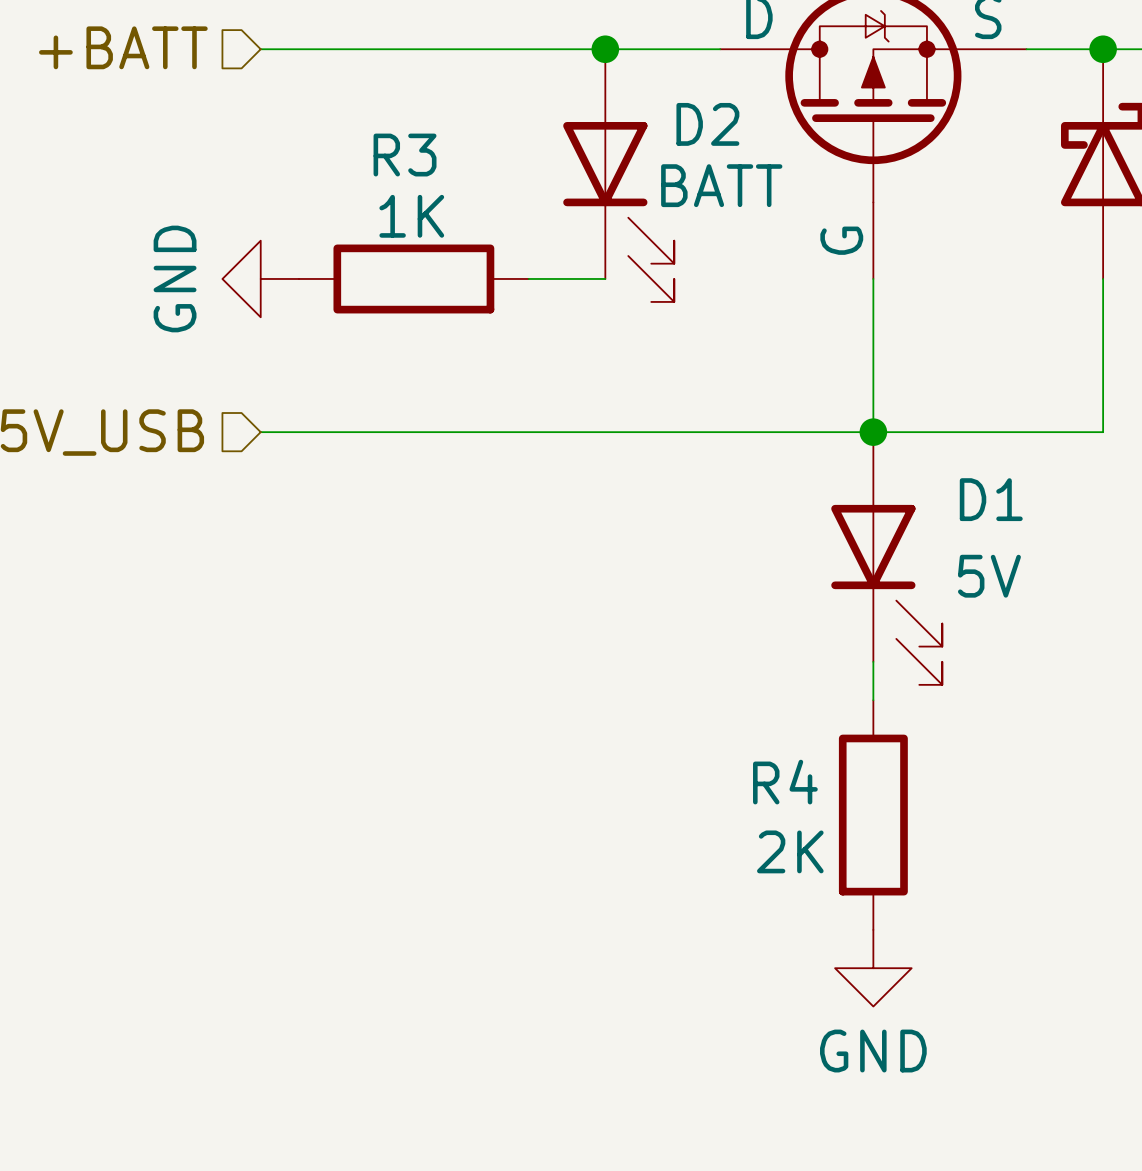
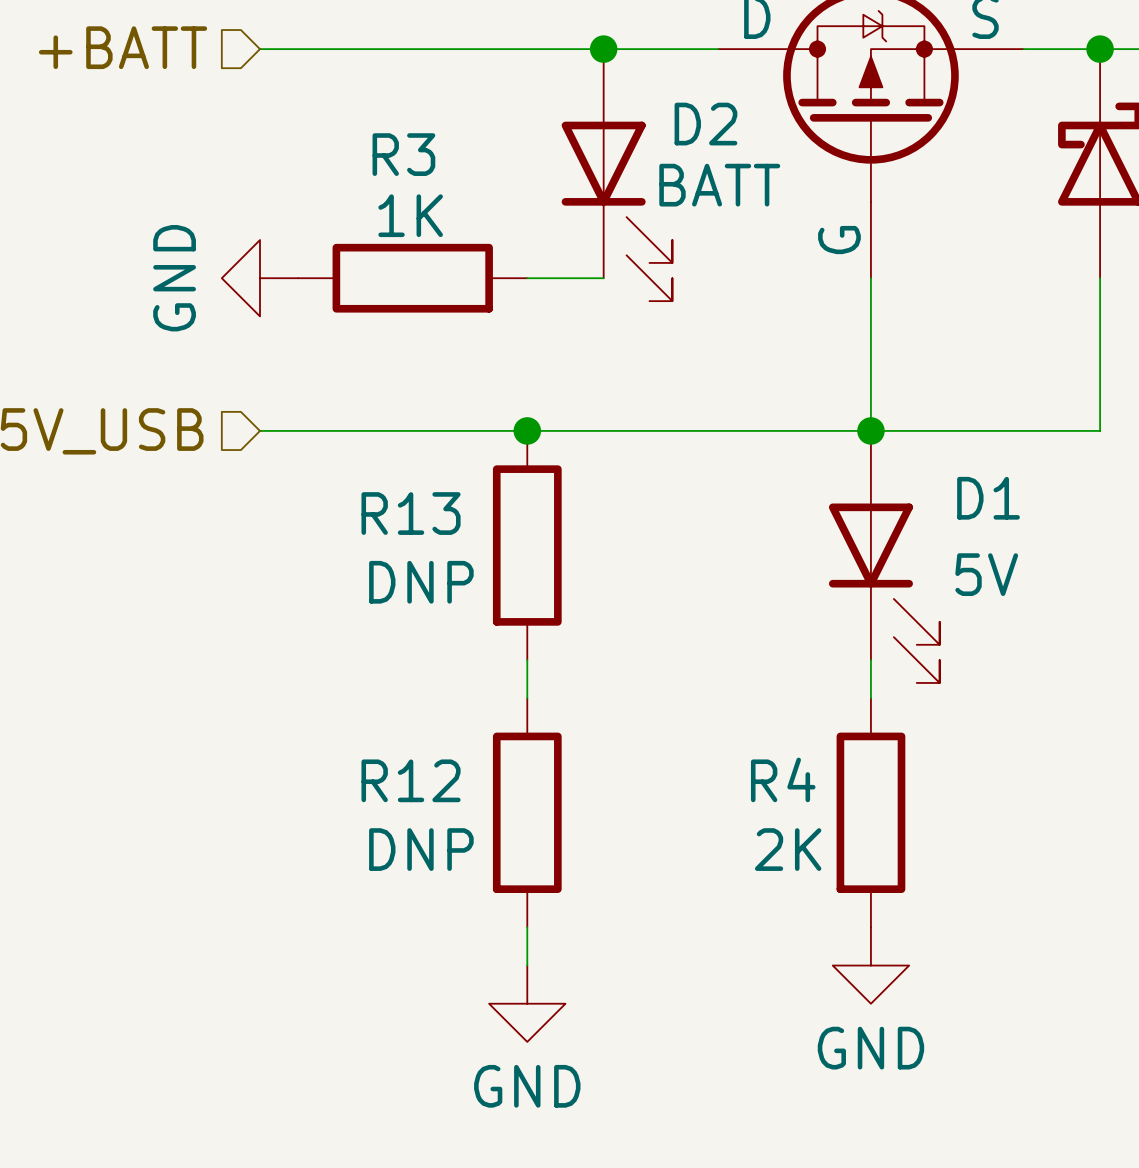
junction: none -> (527, 430)
R13: none -> DNP (527, 545)
wire: none -> (527, 660) (527, 698)
R12: none -> DNP (527, 812)
wire: none -> (527, 927) (527, 965)
power symbol: none -> GND (527, 1003)

